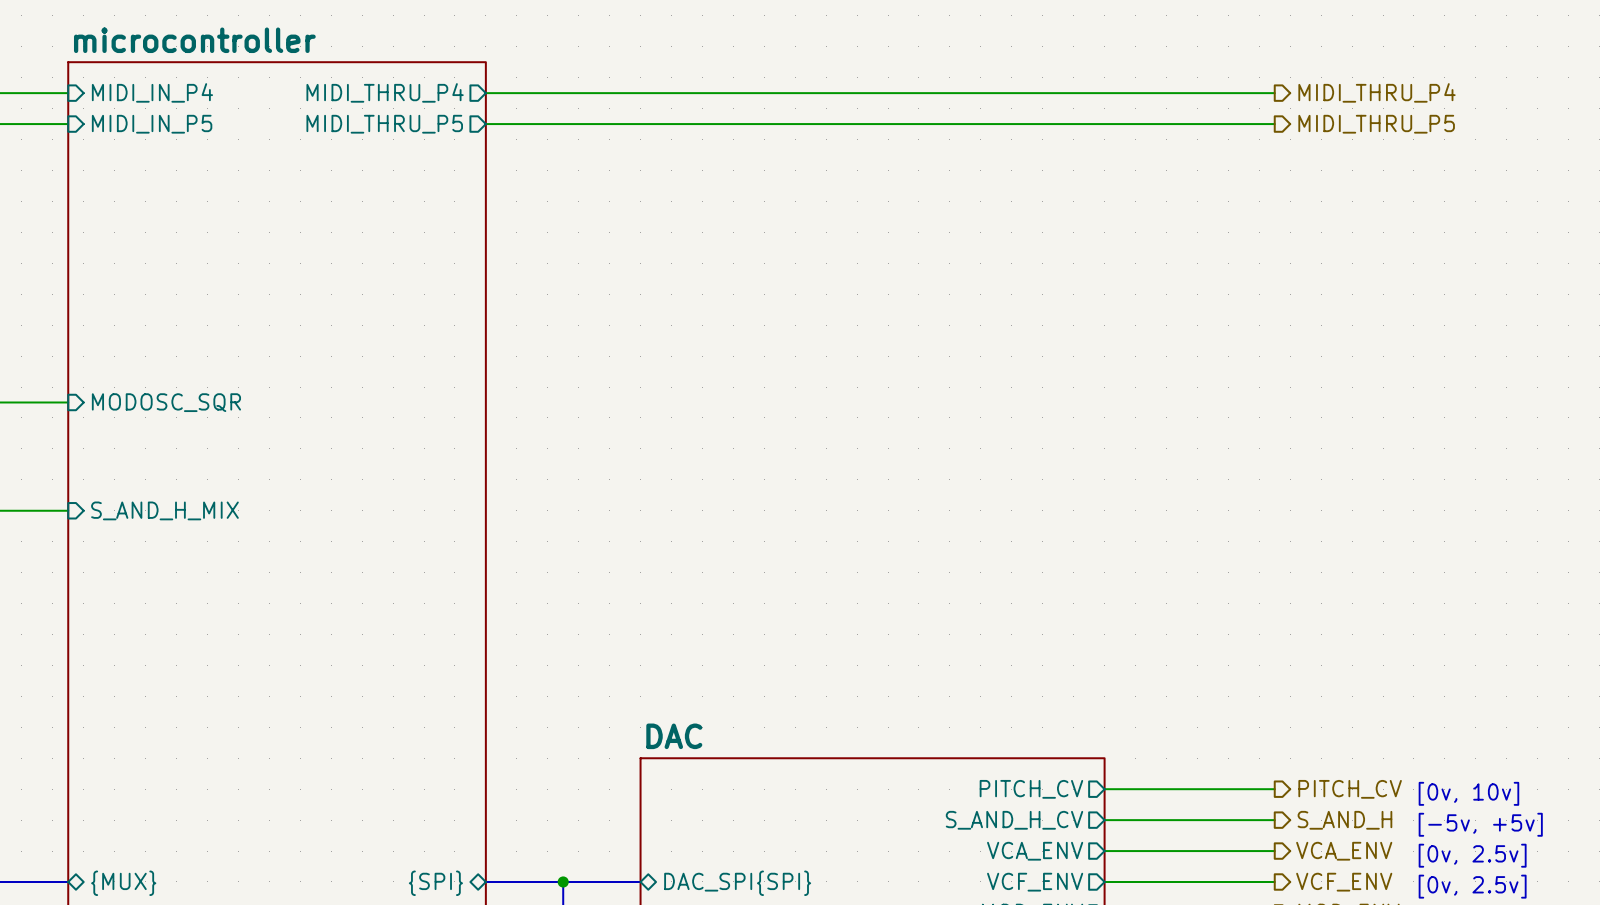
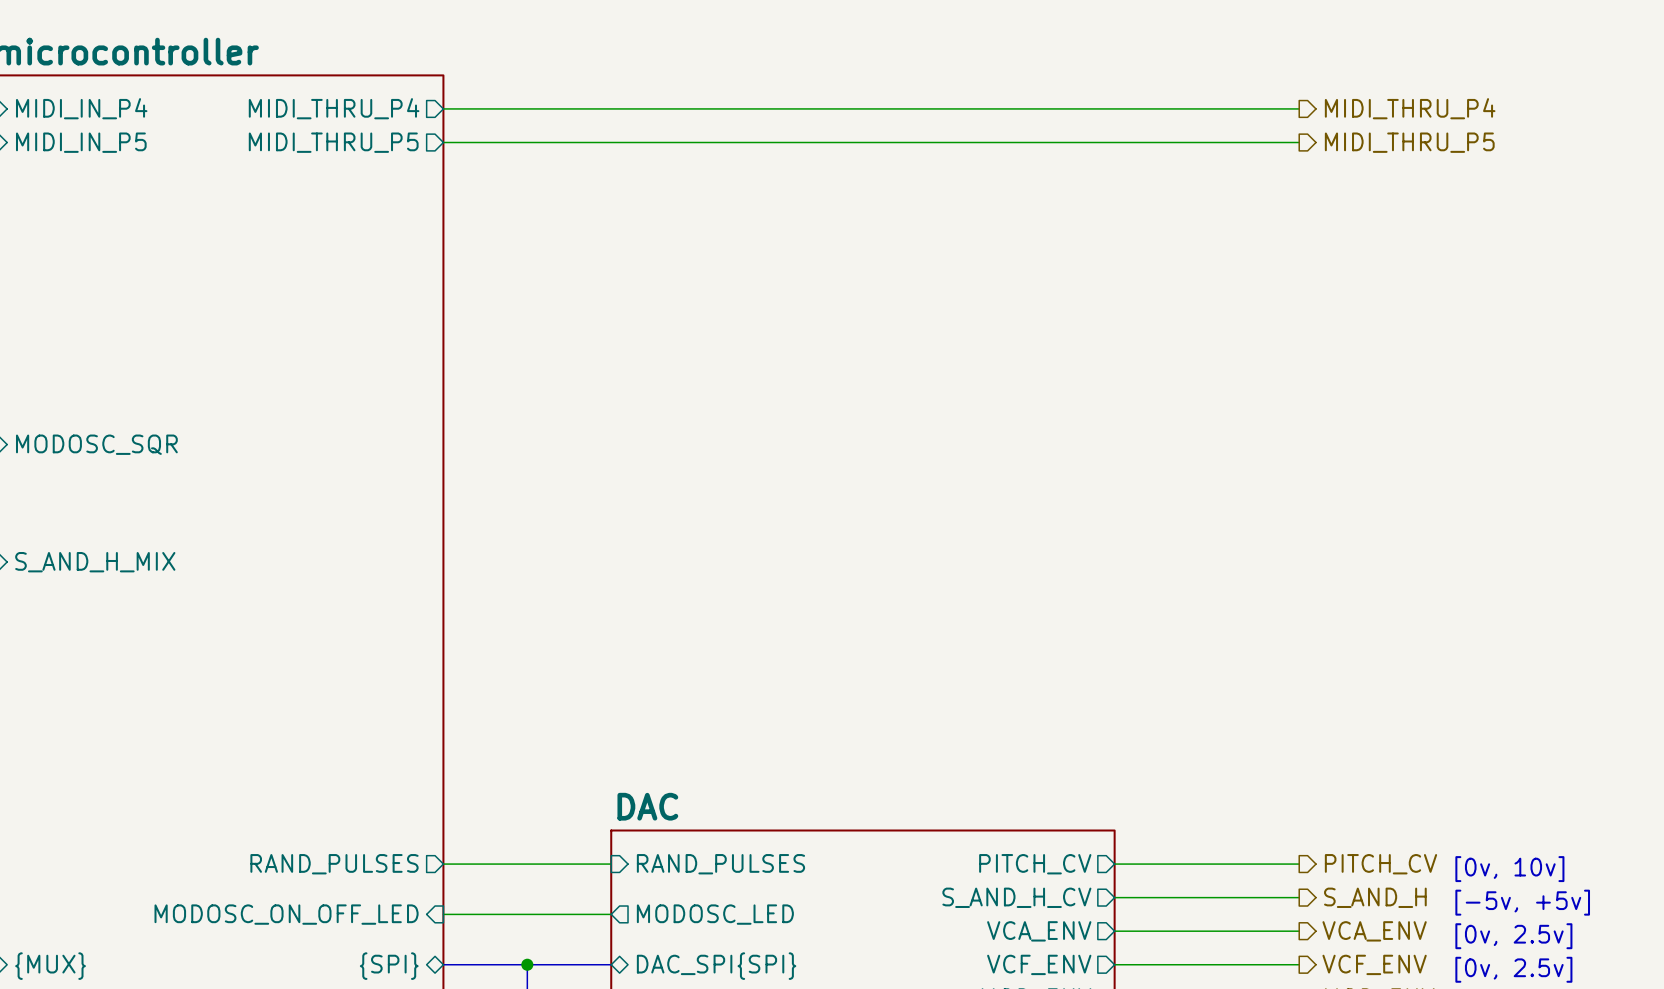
sheet pin: none -> RAND_PULSES (334, 864)
wire: none -> (443, 864) (611, 864)
sheet pin: none -> RAND_PULSES (720, 864)
sheet pin: none -> MODOSC_ON_OFF_LED (286, 914)
wire: none -> (443, 914) (611, 914)
sheet pin: none -> MODOSC_LED (715, 914)

